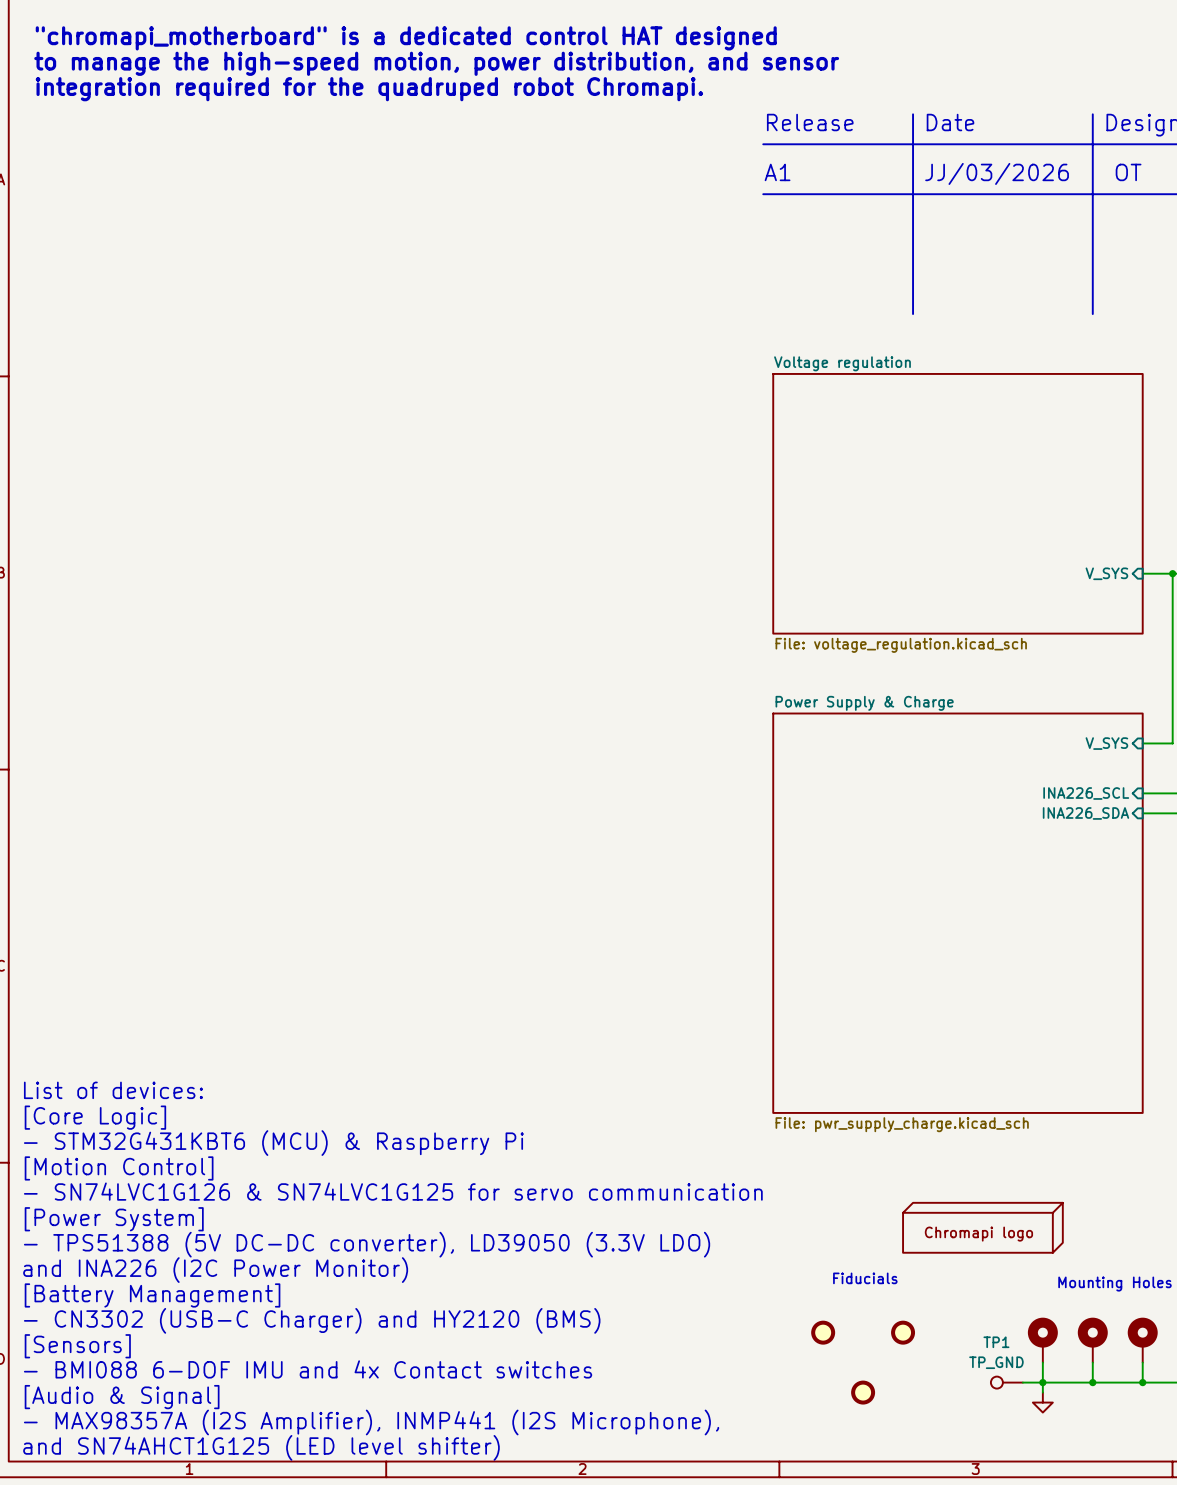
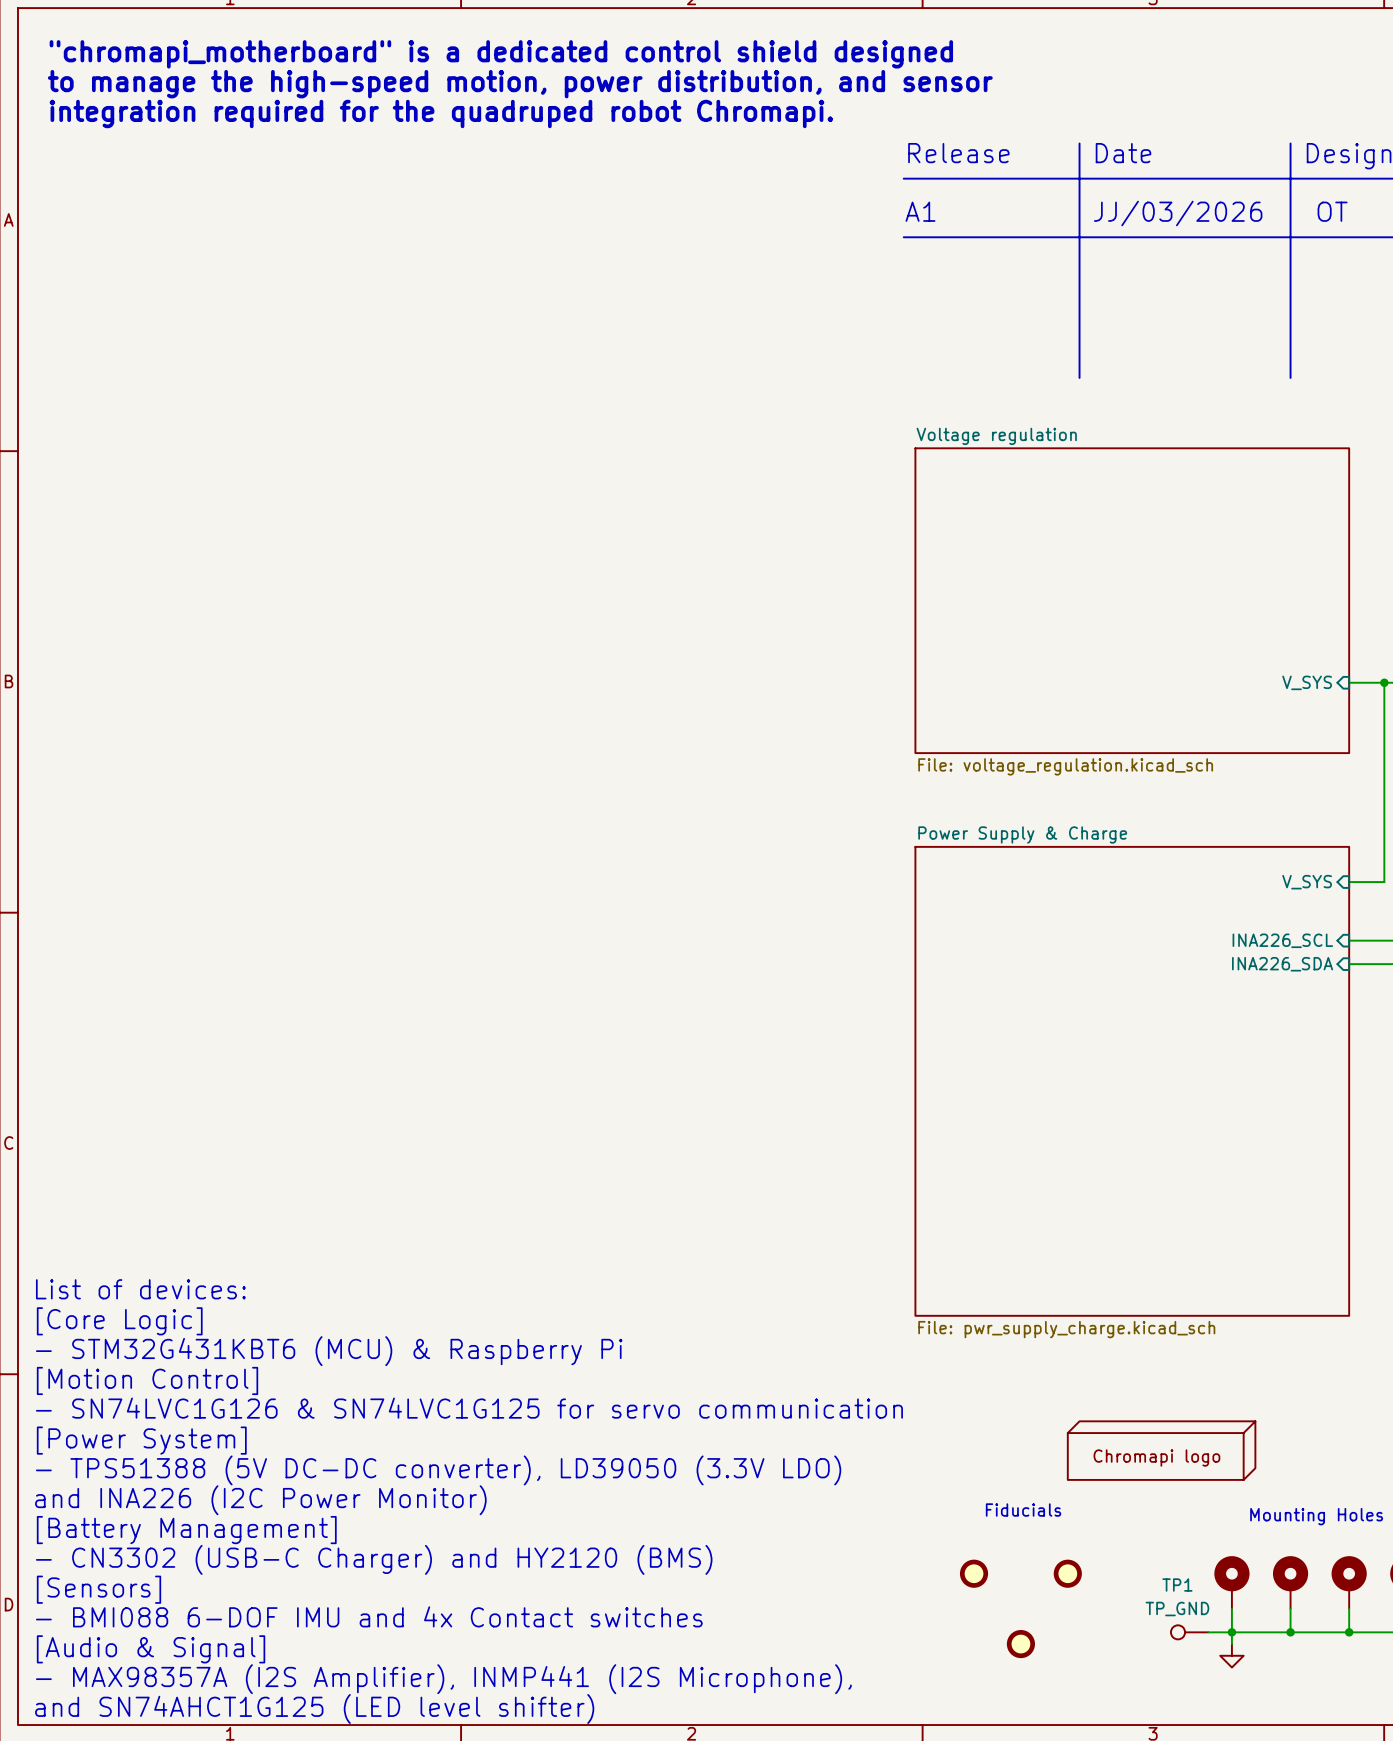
text: "chromapi_motherboard" is a dedicated control HAT designed (406, 38) -> "chromapi_motherboard" is a dedicated control shield designed (501, 54)

